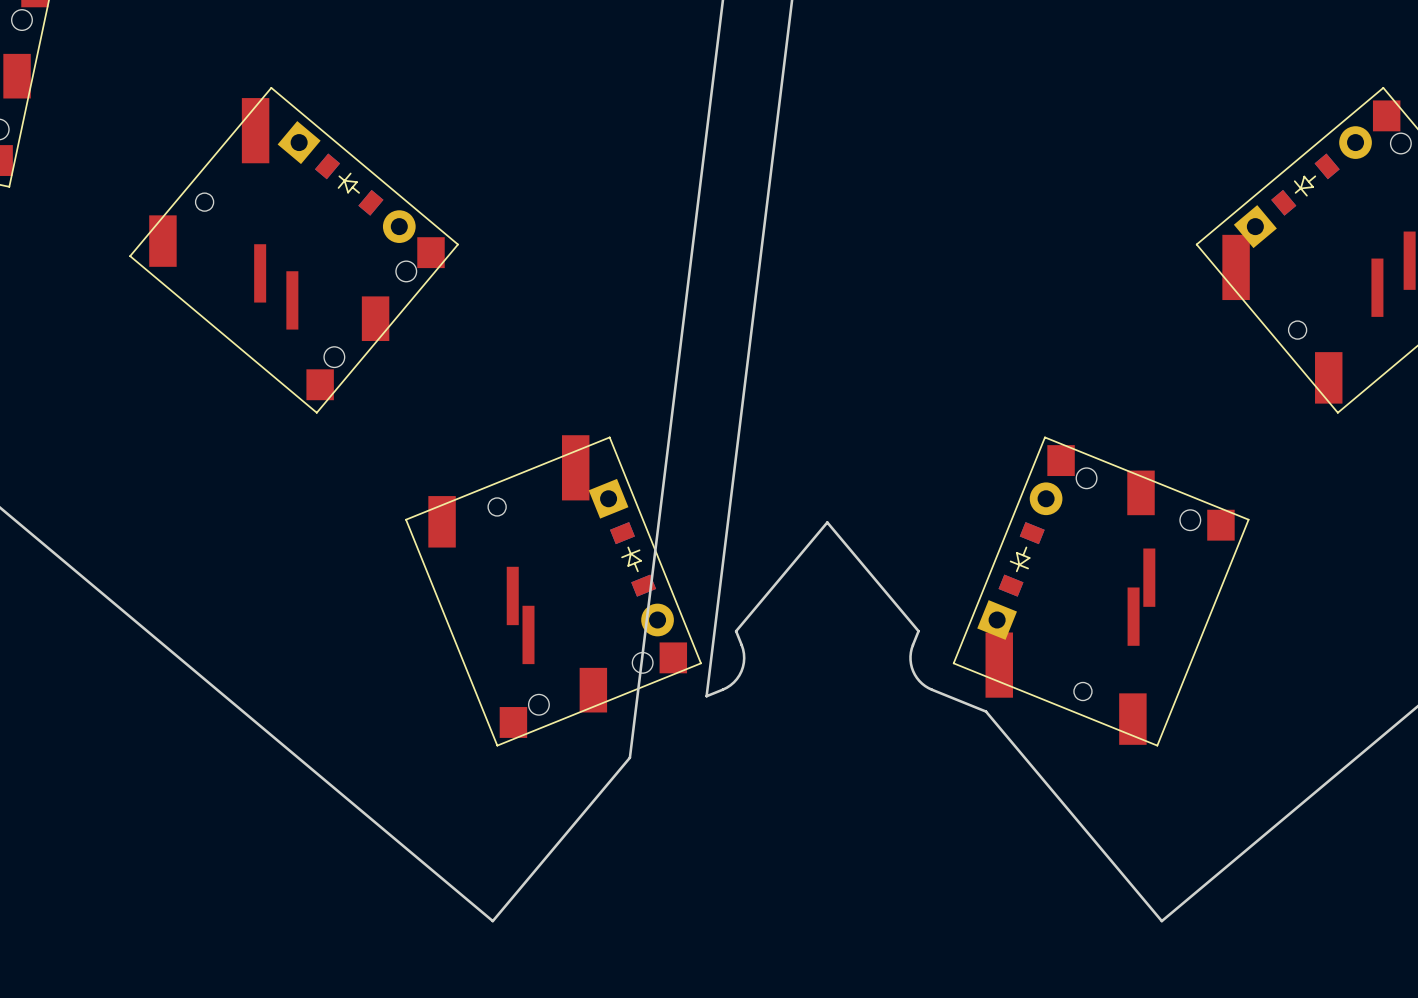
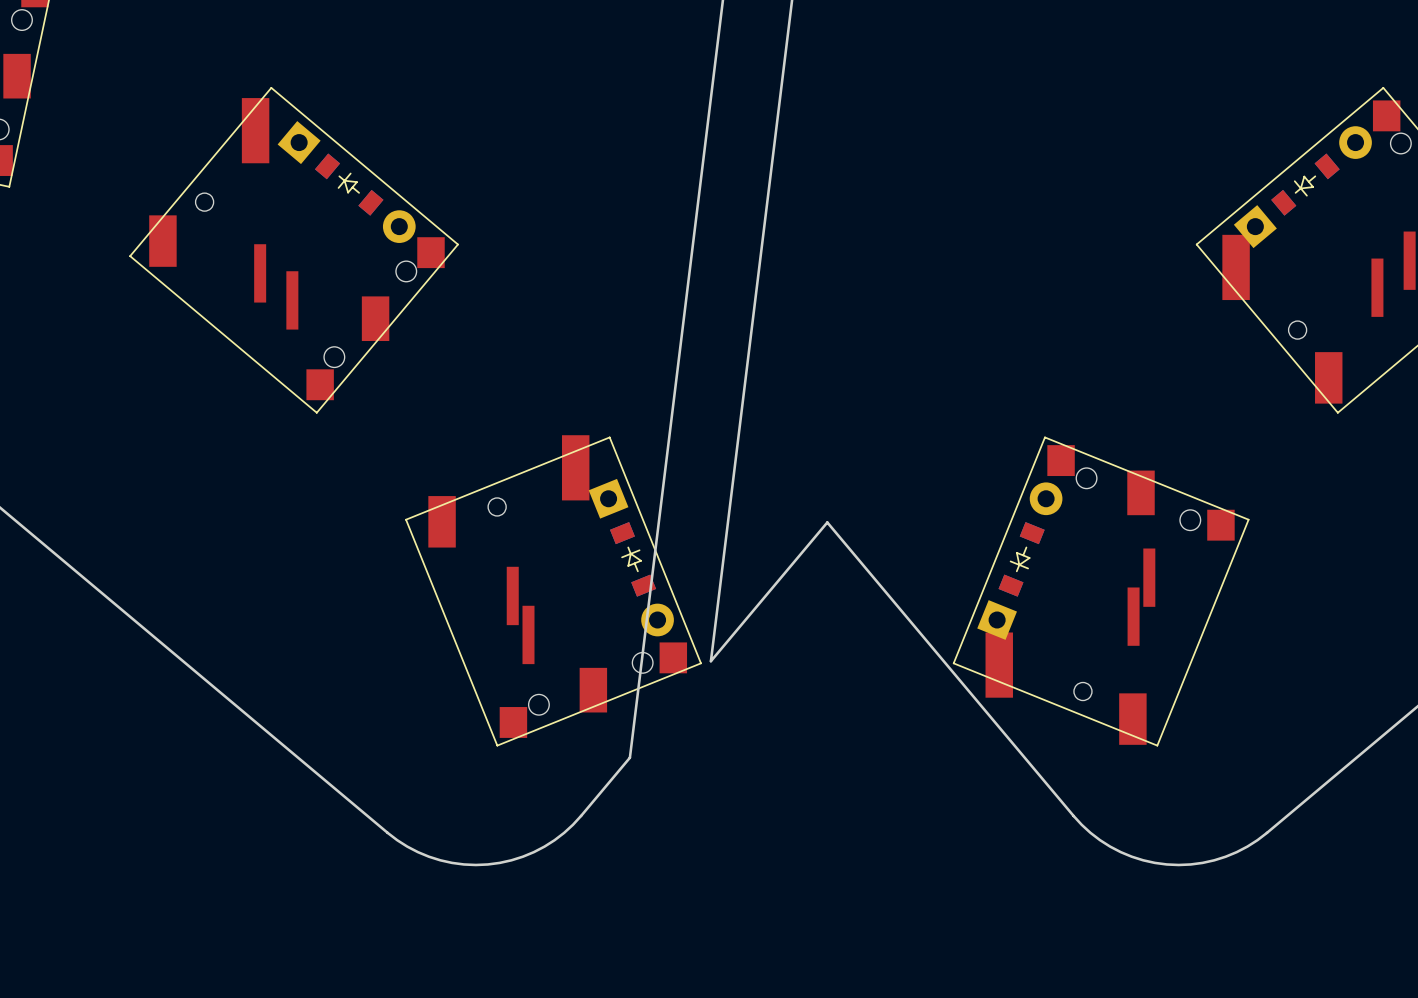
board edge: (736, 631) (743, 653) (741, 671) (730, 685) (706, 696) (710, 661) -> (736, 631) (710, 661)
board edge: (918, 631) (911, 648) (910, 660) (913, 671) (919, 680) (931, 689) (986, 711) -> (918, 631) (986, 711)
board edge: (581, 815) (492, 921) (387, 832) -> (581, 815) (564, 832) (533, 852) (511, 860) (487, 864) (452, 862) (428, 856) (407, 846) (387, 832)
board edge: (1073, 815) (1161, 921) (1267, 832) -> (1073, 815) (1090, 832) (1120, 852) (1143, 860) (1166, 864) (1190, 864) (1214, 860) (1247, 846) (1267, 832)

